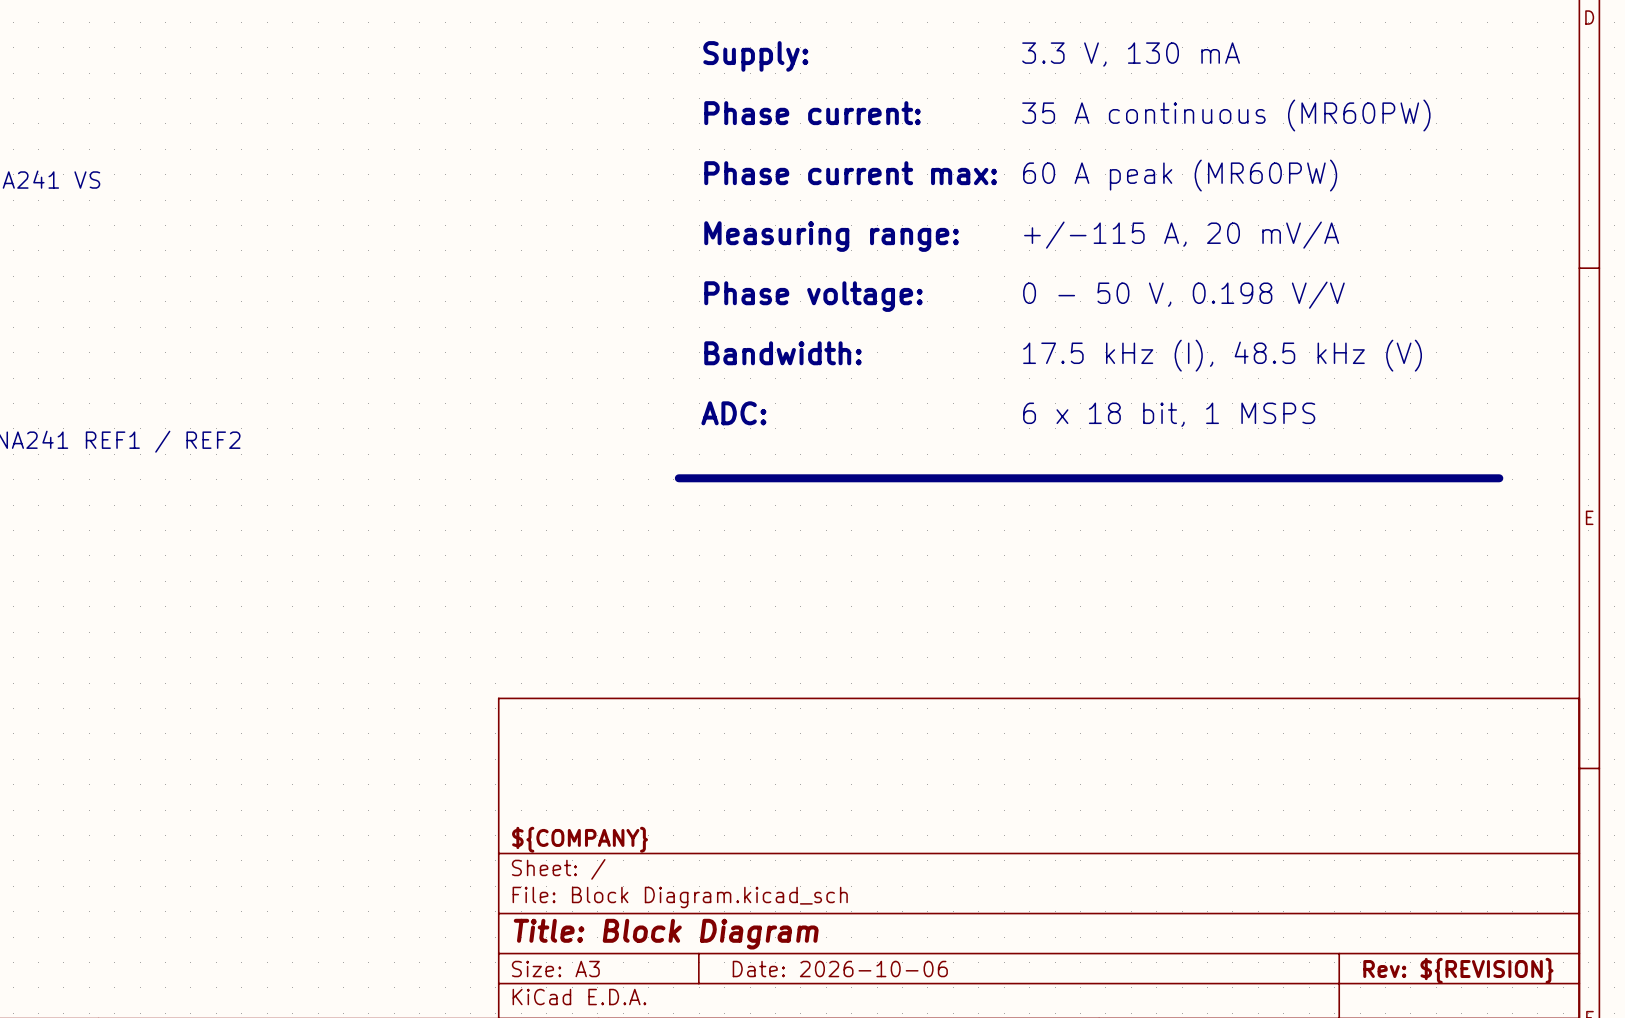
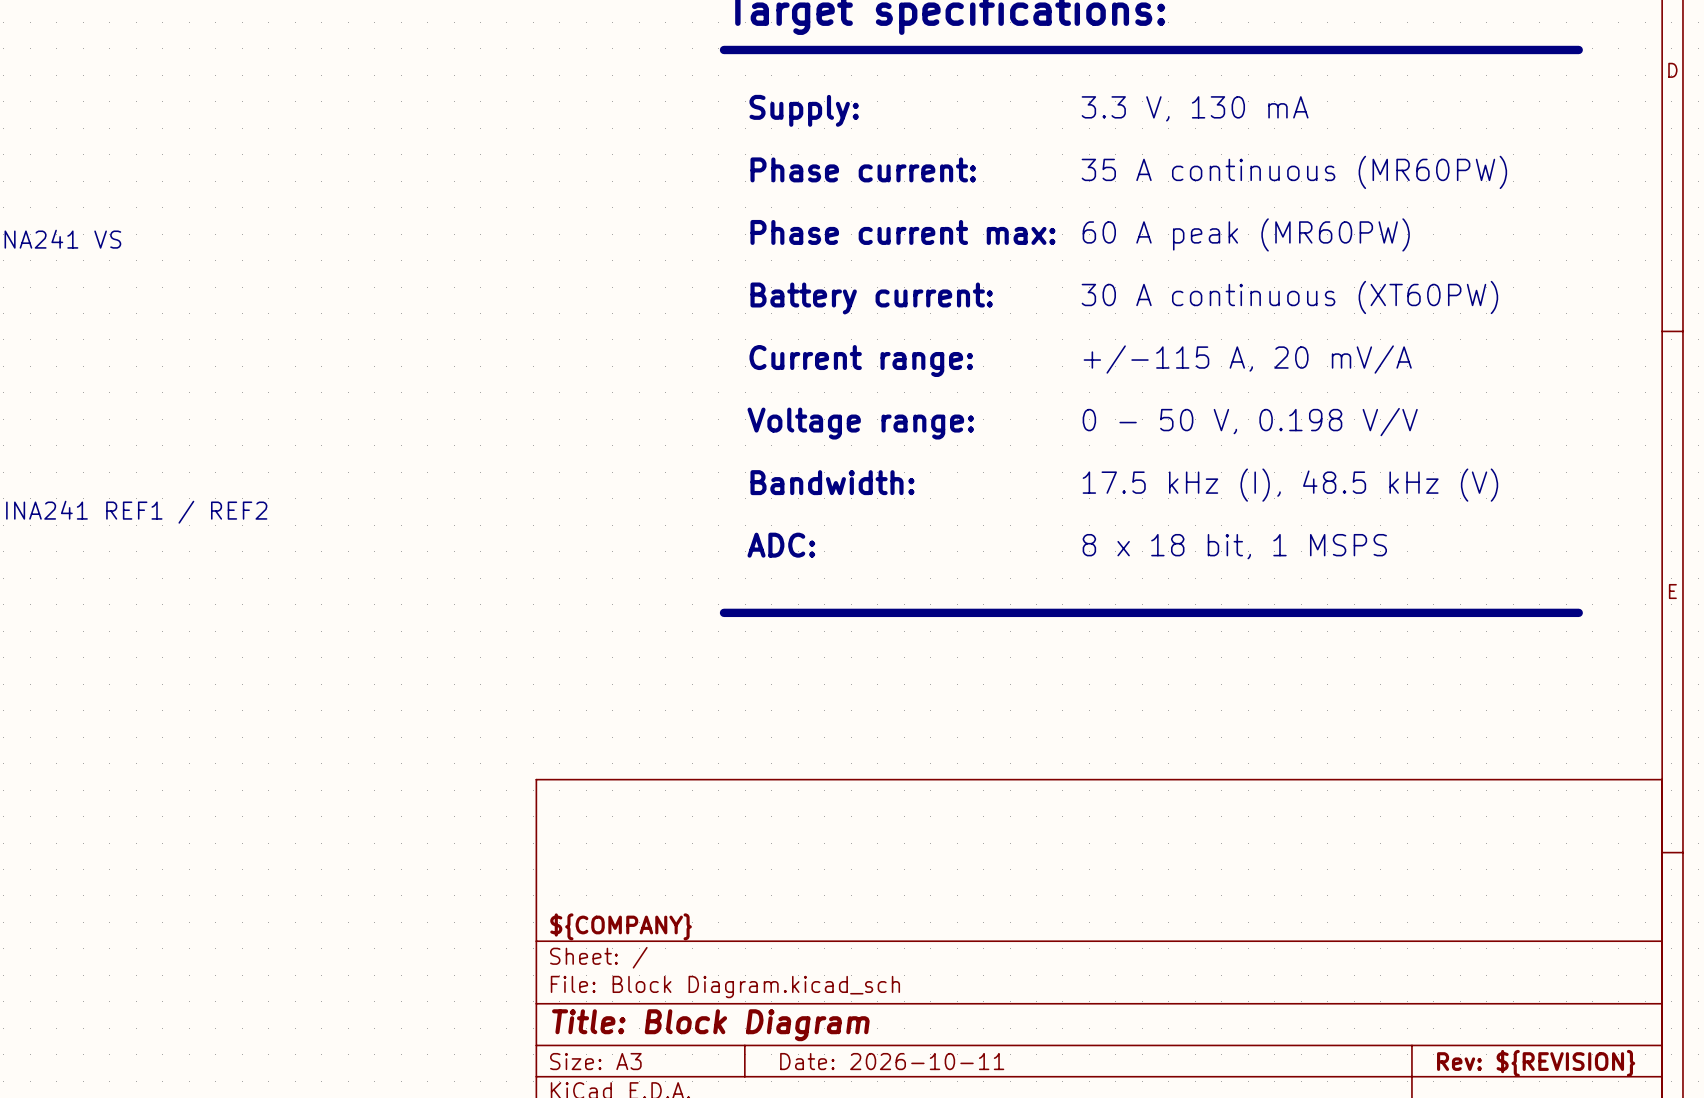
text: +/-115 A, 20 mV/A (1181, 235) -> 30 A continuous (XT60PW) (1289, 297)
text: Measuring range: (831, 236) -> Battery current: (871, 298)
text: 0 - 50 V, 0.198 V/V (1183, 295) -> +/-115 A, 20 mV/A (1247, 359)
text: Phase voltage: (813, 296) -> Current range: (861, 361)
text: Bandwidth: (782, 353) -> Voltage range: (860, 423)
text: 17.5 kHz (I), 48.5 kHz (V) (1222, 355) -> 0 - 50 V, 0.198 V/V (1250, 422)
text: ADC: (733, 413) -> Bandwidth: (832, 482)
text: 6 x 18 bit, 1 MSPS (1169, 414) -> 17.5 kHz (I), 48.5 kHz (V) (1290, 485)
text: none -> ADC: (781, 545)
text: none -> 8 x 18 bit, 1 MSPS (1234, 546)
line: (678, 478) (1499, 478) -> (723, 612) (1578, 612)
title block: Date: 2026-10-06 (840, 969) -> Date: 2026-10-11 (892, 1061)

